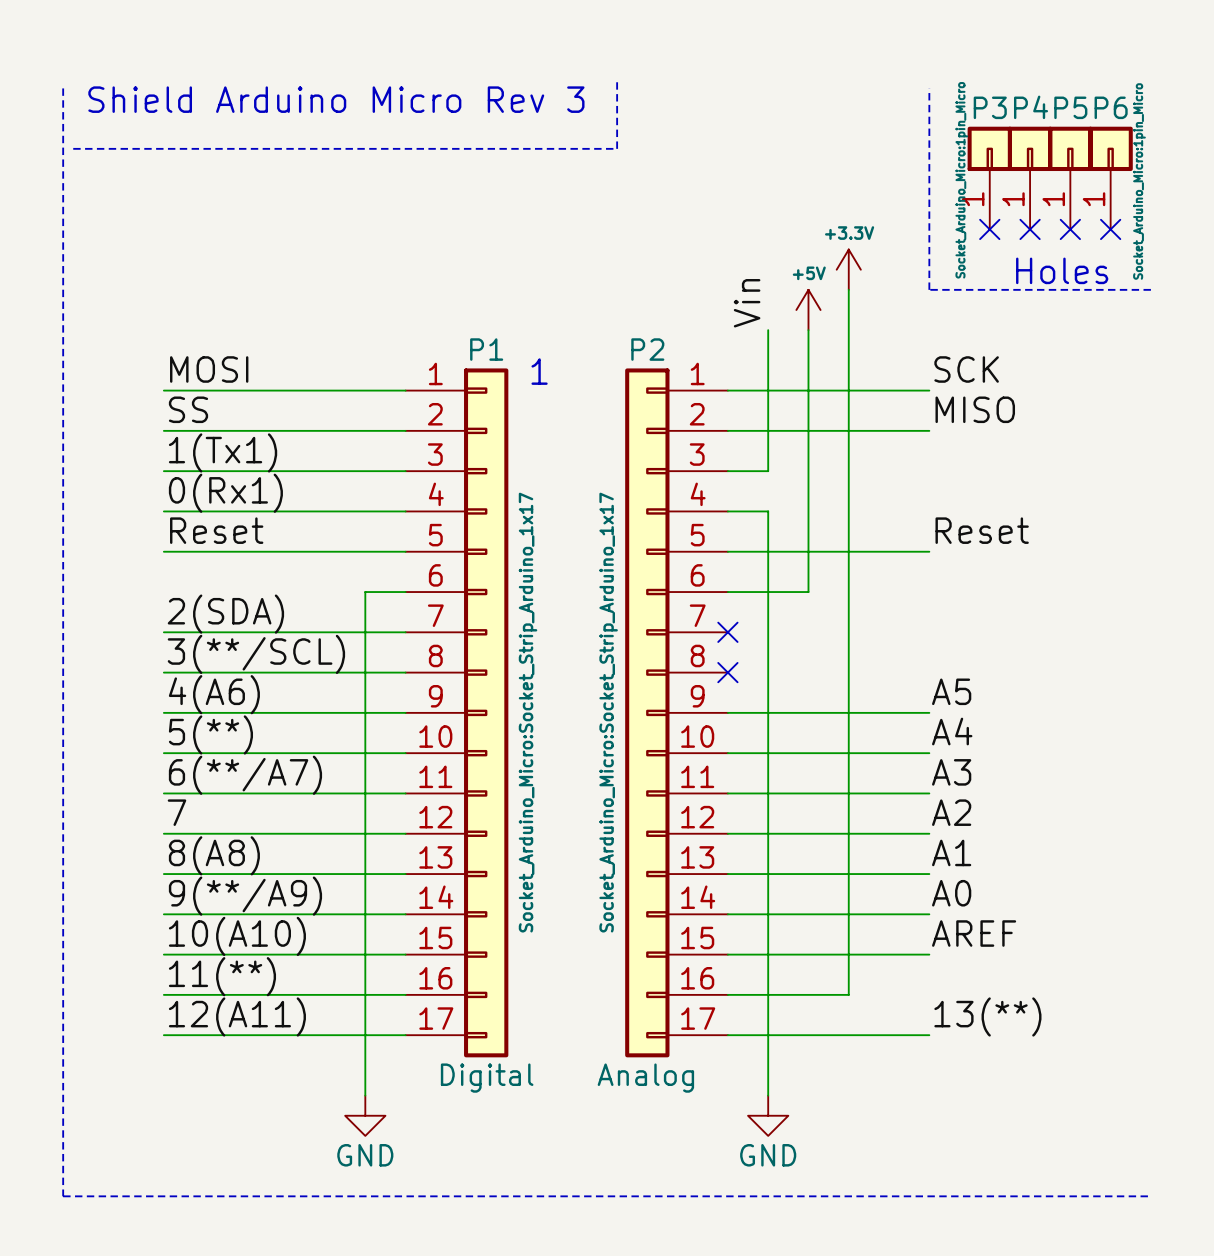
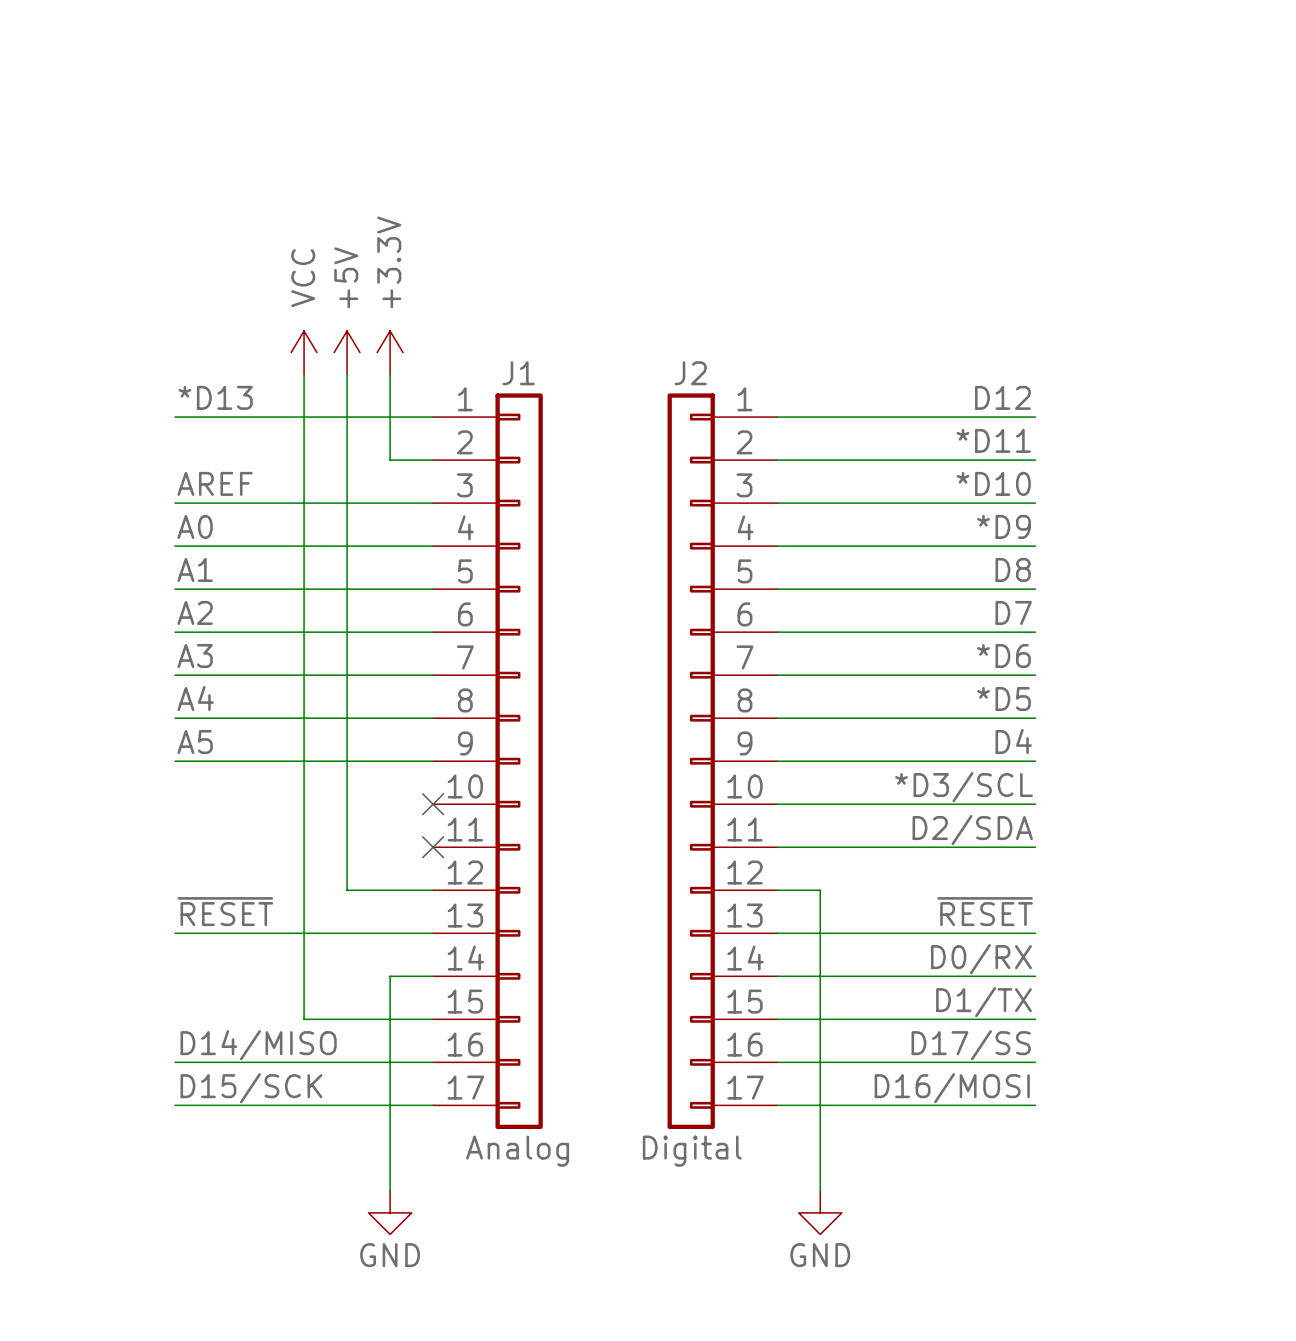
line: (617, 78) (617, 148) (73, 148) -> none
line: (63, 88) (63, 1196) (1150, 1196) -> none
line: (929, 88) (929, 289) (1150, 289) -> none
text: Shield Arduino Micro Rev 3 (336, 99) -> none
P3: (989, 178) -> none
P4: (1030, 178) -> none
P5: (1070, 178) -> none
P6: (1110, 178) -> none
no-connect mark: (989, 229) -> none
no-connect mark: (1030, 229) -> none
no-connect mark: (1070, 229) -> none
no-connect mark: (1110, 229) -> none
power symbol: +3.3V (848, 269) -> none
text: Holes (1062, 270) -> none
wire: (848, 289) (848, 994) -> (1035, 1062) (906, 1062)
label: Vin (747, 303) -> none
power symbol: +5V (808, 310) -> none
power symbol: none -> VCC (304, 352)
power symbol: none -> +5V (347, 352)
power symbol: none -> +3.3V (390, 352)
wire: (768, 330) (768, 471) -> (1035, 503) (820, 503)
wire: (808, 330) (808, 592) -> (1035, 632) (863, 632)
P1 name: P1 (486, 349) -> J1 (518, 373)
P2 name: P2 (647, 349) -> J2 (690, 373)
label: MOSI (209, 369) -> *D13 (215, 397)
label: SCK (966, 369) -> none
text: 1 (539, 371) -> none
label: none -> D12 (1002, 397)
wire: none -> (992, 417) (1035, 417)
label: SS (188, 409) -> none
label: MISO (975, 409) -> none
label: none -> *D11 (993, 440)
wire: (163, 430) (365, 430) -> (390, 374) (390, 460)
wire: none -> (992, 460) (1035, 460)
label: 1(Tx1) (223, 452) -> AREF (215, 483)
label: none -> *D10 (993, 483)
label: 0(Rx1) (225, 493) -> A0 (195, 526)
label: none -> *D9 (1003, 526)
wire: (768, 511) (768, 833) (929, 833) -> (820, 546) (1035, 546)
label: Reset (216, 530) -> A1 (195, 569)
label: Reset (982, 530) -> none
label: none -> D8 (1013, 569)
wire: none -> (992, 589) (1035, 589)
label: none -> A2 (195, 612)
label: none -> D7 (1013, 612)
wire: (365, 592) (365, 914) (163, 914) -> (390, 632) (174, 632)
label: 2(SDA) (225, 614) -> A3 (195, 655)
label: none -> *D6 (1003, 655)
wire: none -> (777, 675) (1035, 675)
no-connect mark: (727, 632) -> none
label: 3(**/SCL) (256, 654) -> A4 (195, 698)
label: none -> *D5 (1003, 699)
wire: none -> (777, 718) (1035, 718)
no-connect mark: (727, 672) -> none
label: A5 (951, 691) -> none
label: 4(A6) (214, 694) -> A5 (195, 742)
label: none -> D4 (1013, 741)
P1 text: Socket_Arduino_Micro:Socket_Strip_Arduino_1x17 (528, 712) -> none
P2 text: Socket_Arduino_Micro:Socket_Strip_Arduino_1x17 (608, 712) -> none
wire: none -> (992, 761) (1035, 761)
label: A4 (952, 731) -> none
label: 5(**) (210, 734) -> none
label: none -> *D3/SCL (964, 787)
wire: (163, 753) (405, 753) -> none
no-connect mark: none -> (433, 804)
wire: none -> (992, 804) (1035, 804)
label: A3 (951, 772) -> none
label: 6(**/A7) (245, 775) -> none
label: none -> D2/SDA (972, 830)
wire: (163, 793) (405, 793) -> none
no-connect mark: none -> (433, 847)
wire: none -> (992, 847) (1035, 847)
label: 7 (176, 812) -> none
label: A2 (951, 812) -> none
wire: (163, 833) (325, 833) -> (347, 374) (347, 890)
label: A1 (951, 852) -> none
label: none -> ~{RESET} (985, 911)
label: 8(A8) (214, 855) -> ~{RESET} (225, 911)
wire: none -> (992, 933) (1035, 933)
label: A0 (951, 893) -> none
label: 9(**/A9) (245, 896) -> none
label: none -> D0/RX (981, 959)
wire: none -> (992, 976) (1035, 976)
label: AREF (974, 933) -> none
label: 10(A10) (237, 936) -> none
label: none -> D1/TX (983, 1002)
wire: (163, 954) (284, 954) -> (304, 374) (304, 1019)
wire: none -> (992, 1019) (1035, 1019)
label: 11(**) (222, 976) -> D14/MISO (258, 1045)
label: none -> D17/SS (971, 1045)
label: 12(A11) (237, 1016) -> D15/SCK (251, 1088)
label: 13(**) (987, 1016) -> none
label: none -> D16/MOSI (952, 1088)
wire: none -> (992, 1105) (1035, 1105)
P1 value: Digital (487, 1078) -> Analog (517, 1151)
P2 value: Analog (645, 1078) -> Digital (692, 1151)
power symbol position: GND (365, 1115) -> GND (390, 1212)
power symbol position: GND (768, 1115) -> GND (820, 1212)

